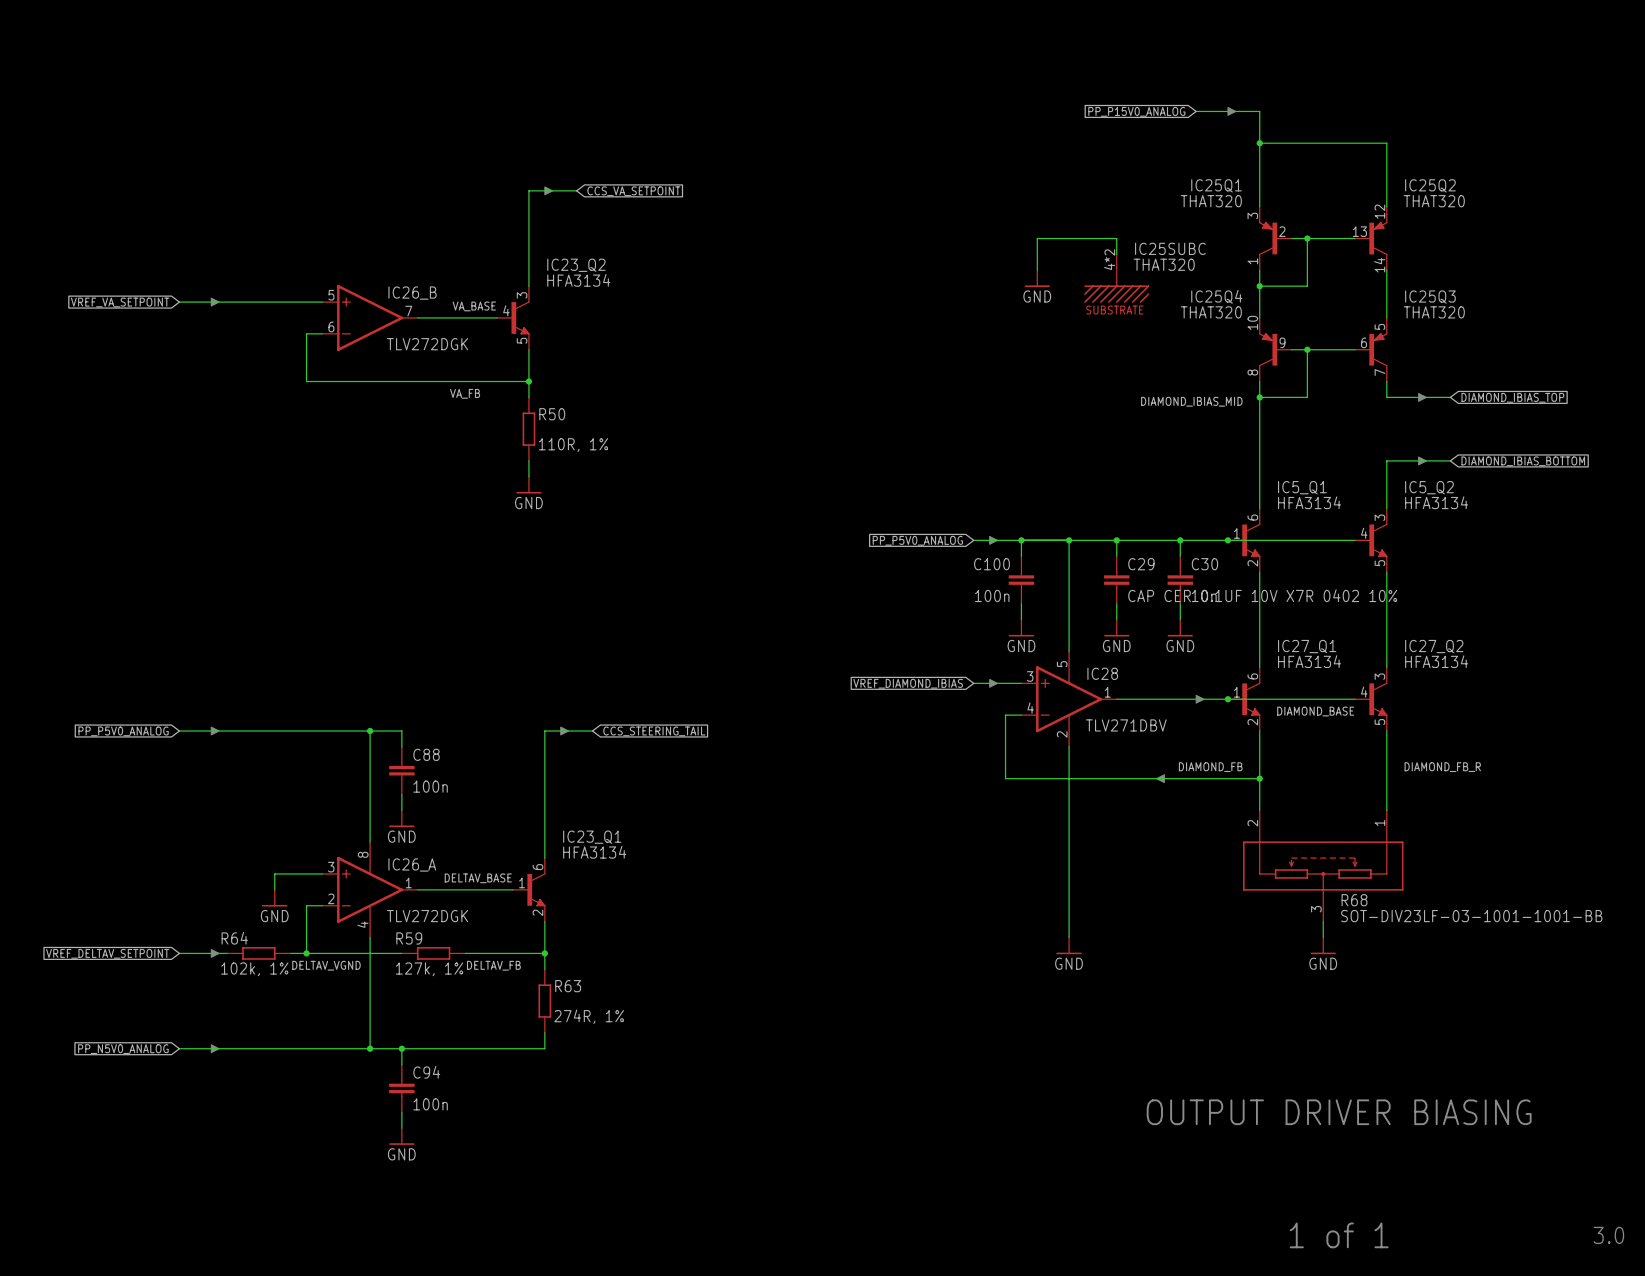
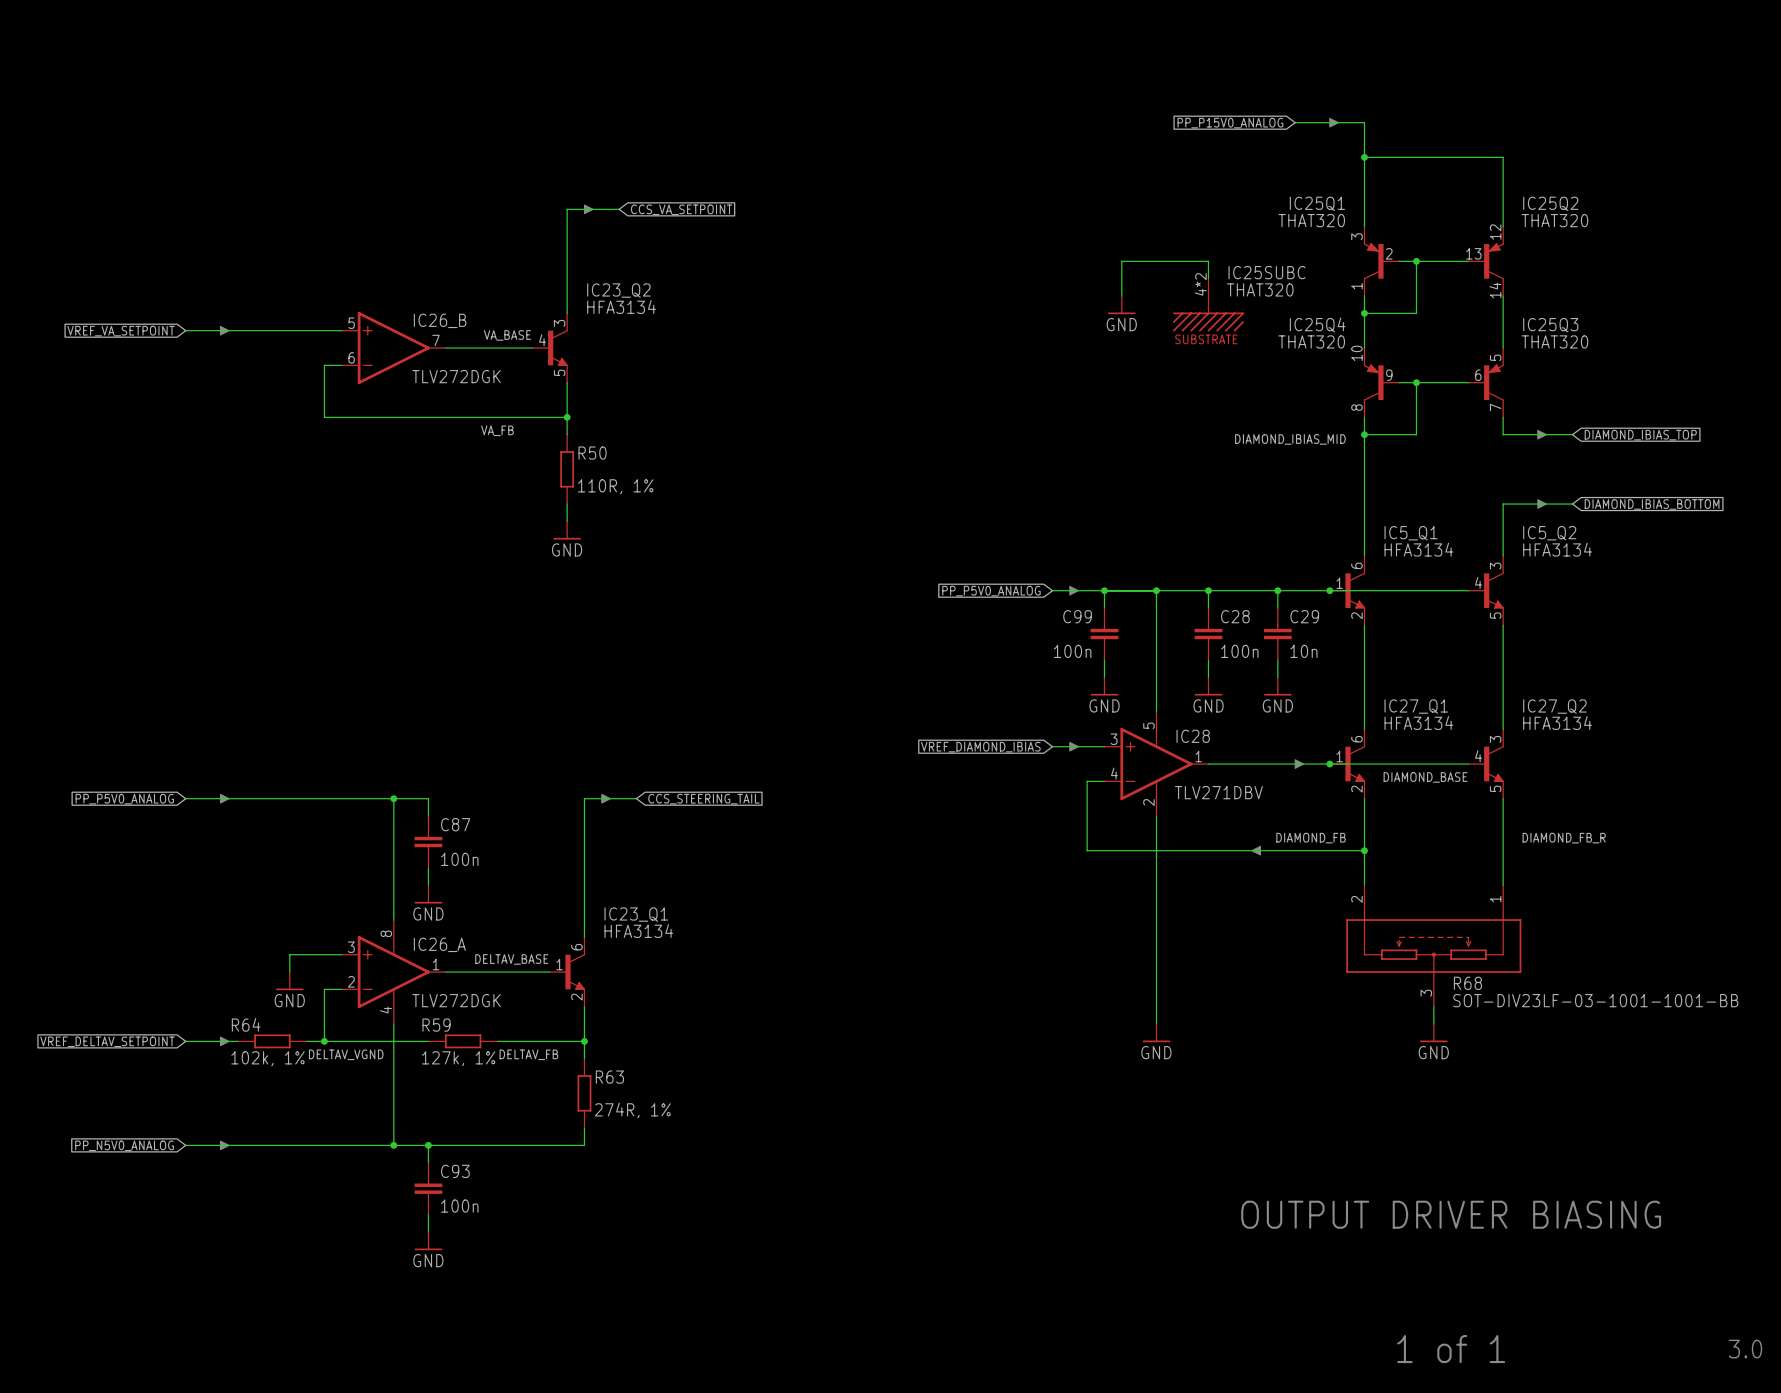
C100 name: C100 (992, 564) -> C99 (1077, 616)
C29 name: C29 (1141, 564) -> C28 (1235, 616)
C30 name: C30 (1204, 564) -> C29 (1304, 616)
C29 value: CAP CER 0.1UF 10V X7R 0402 10% (1262, 595) -> 100n (1239, 651)
C88 name: C88 (426, 754) -> C87 (455, 824)
C94 name: C94 (426, 1072) -> C93 (455, 1171)

